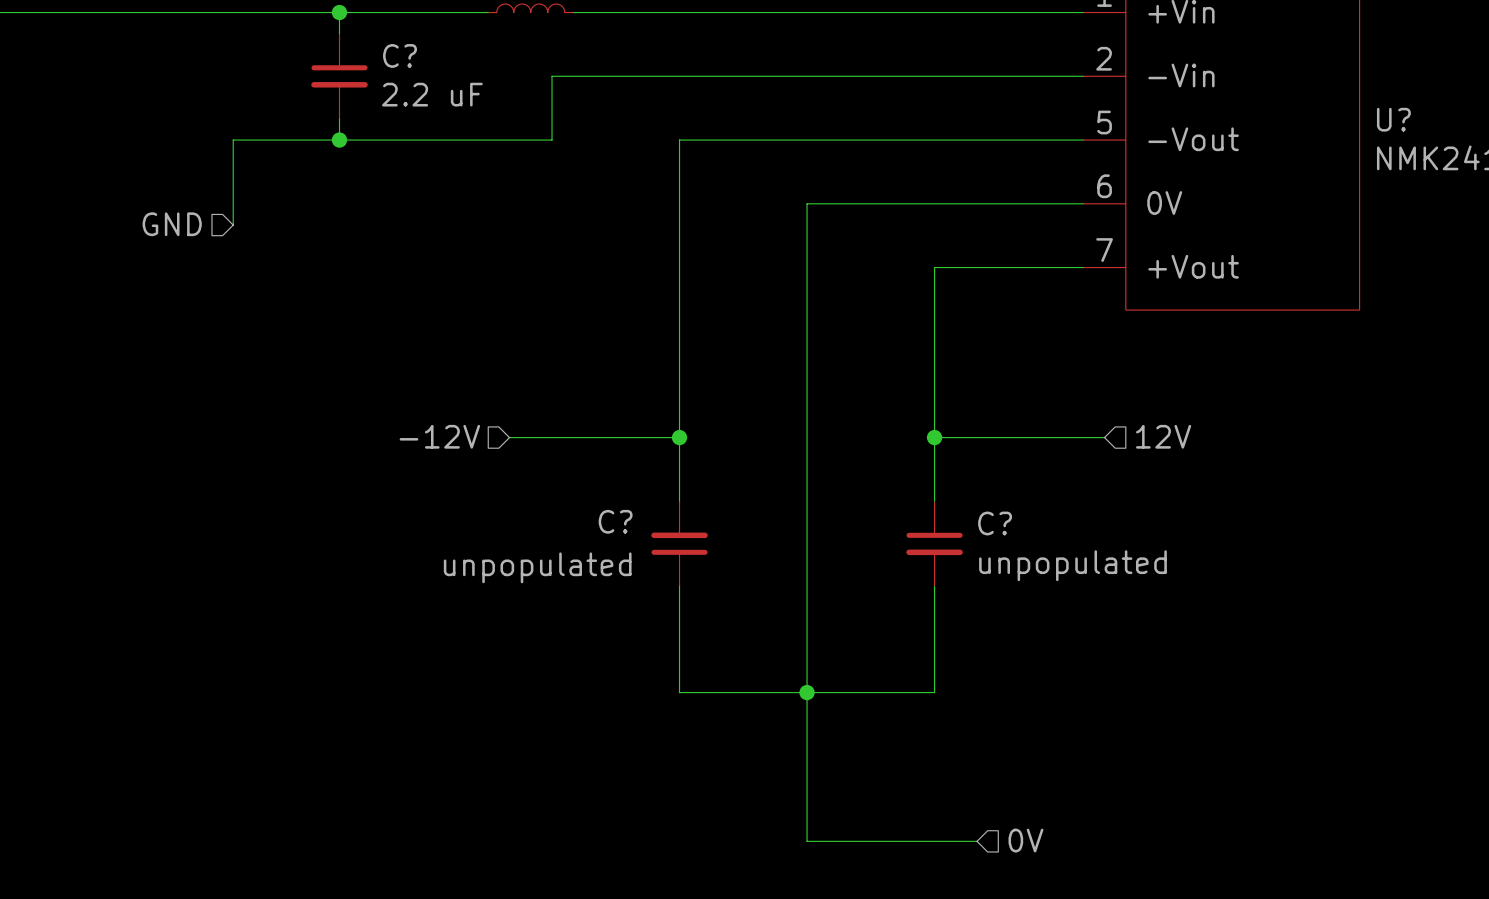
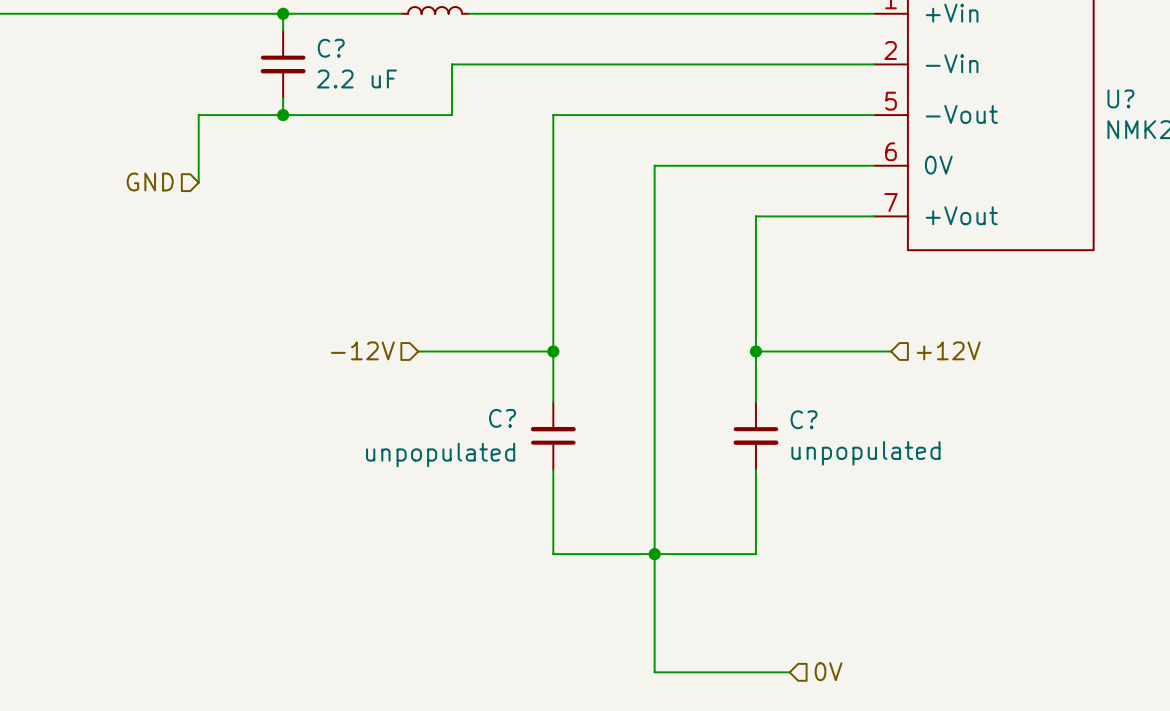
hierarchical label: 12V (1163, 436) -> +12V (948, 350)

